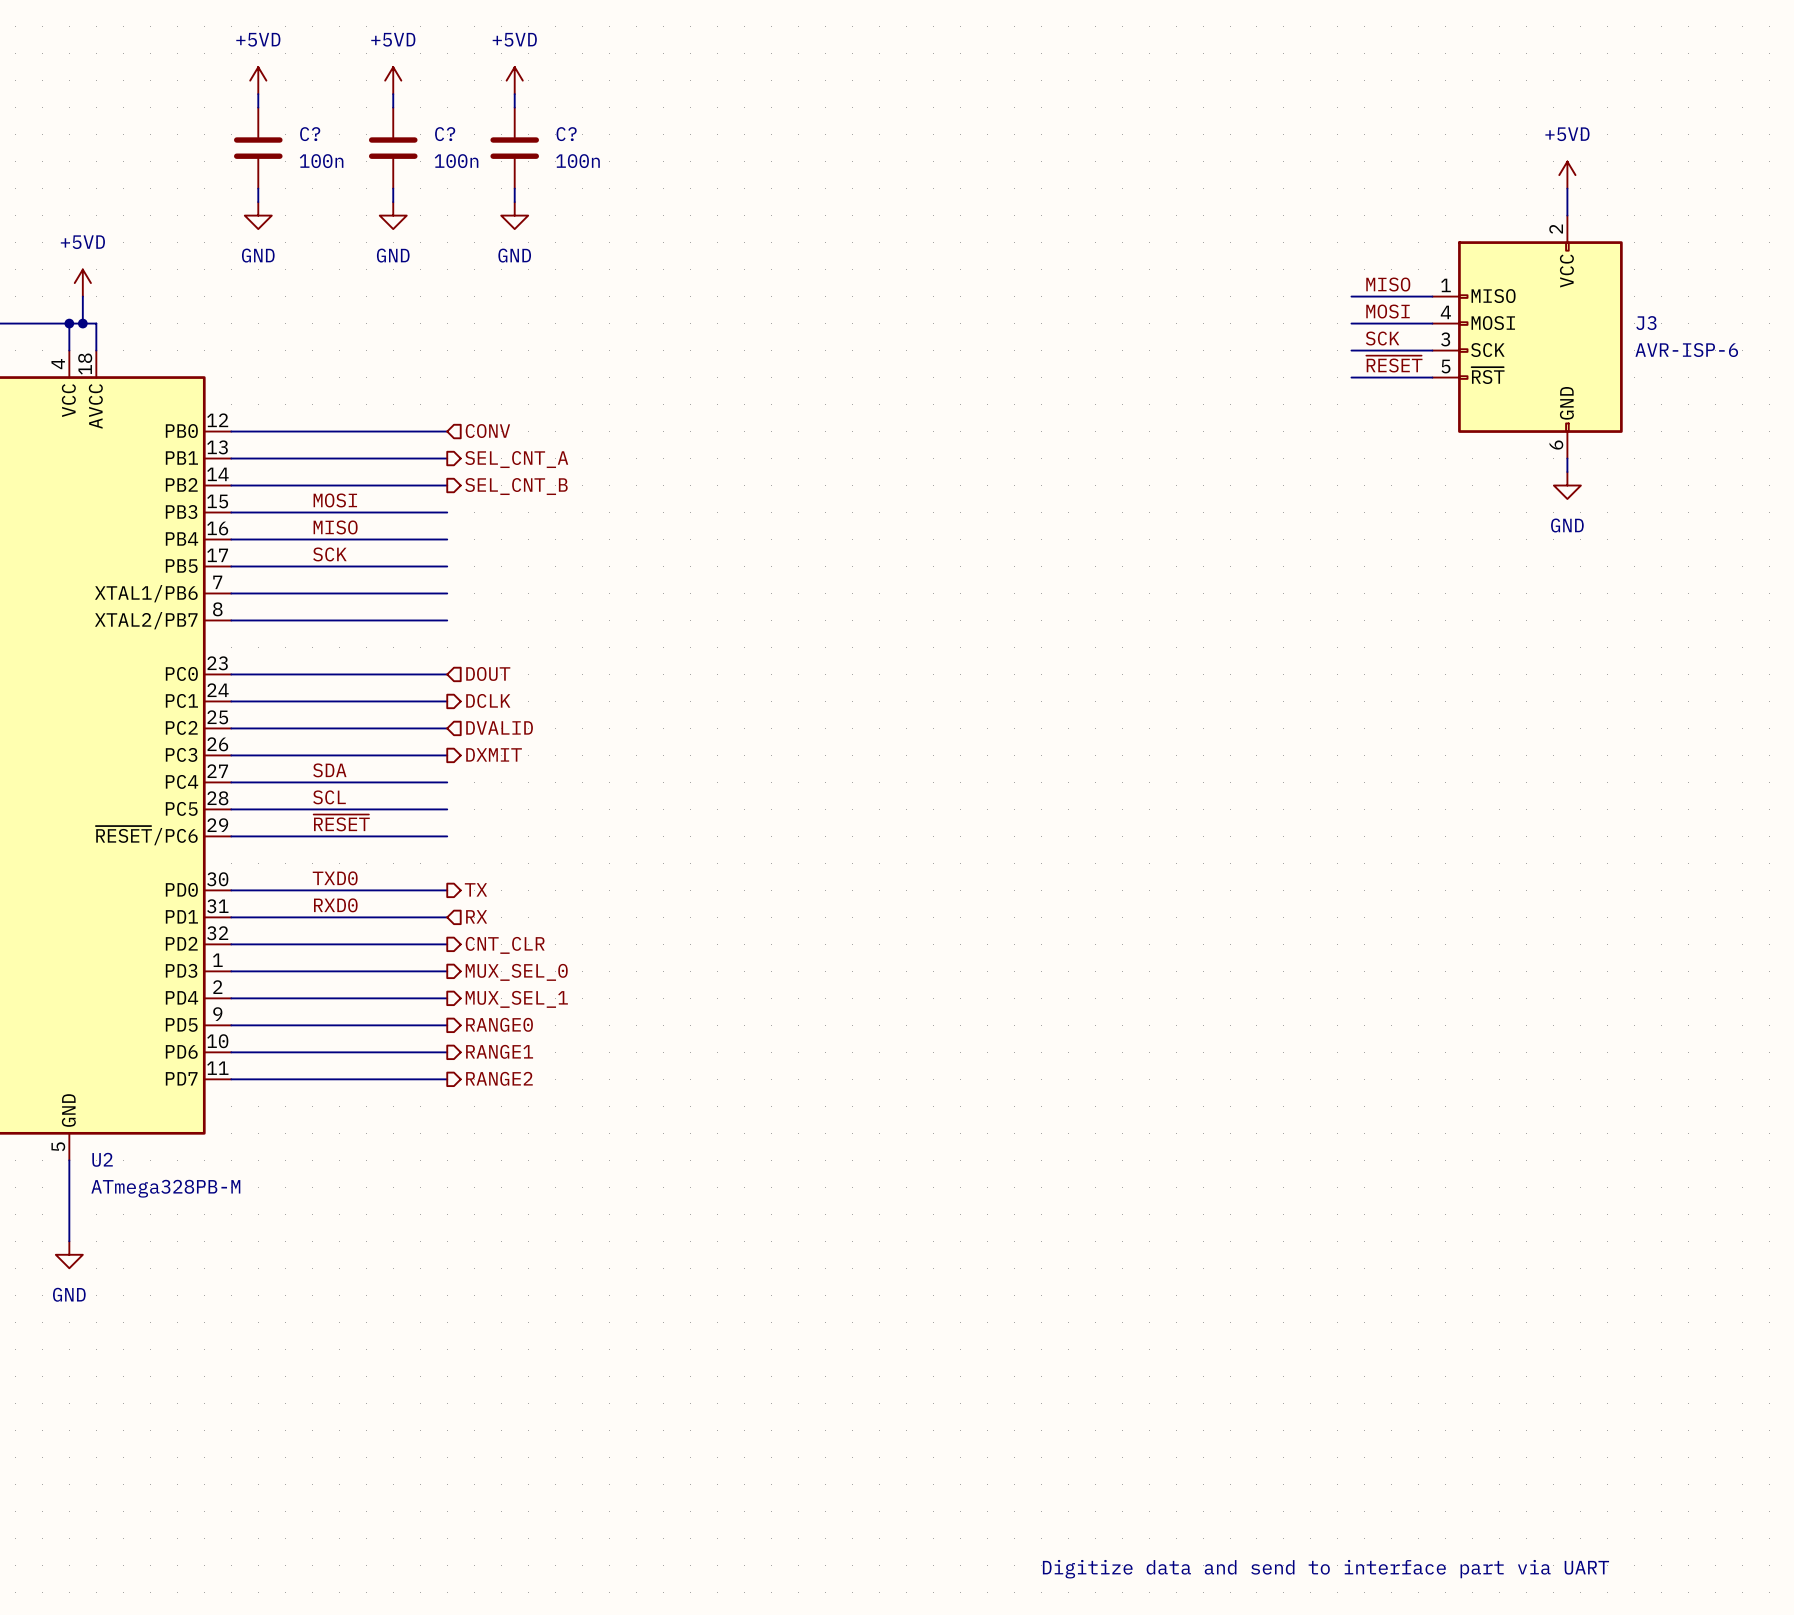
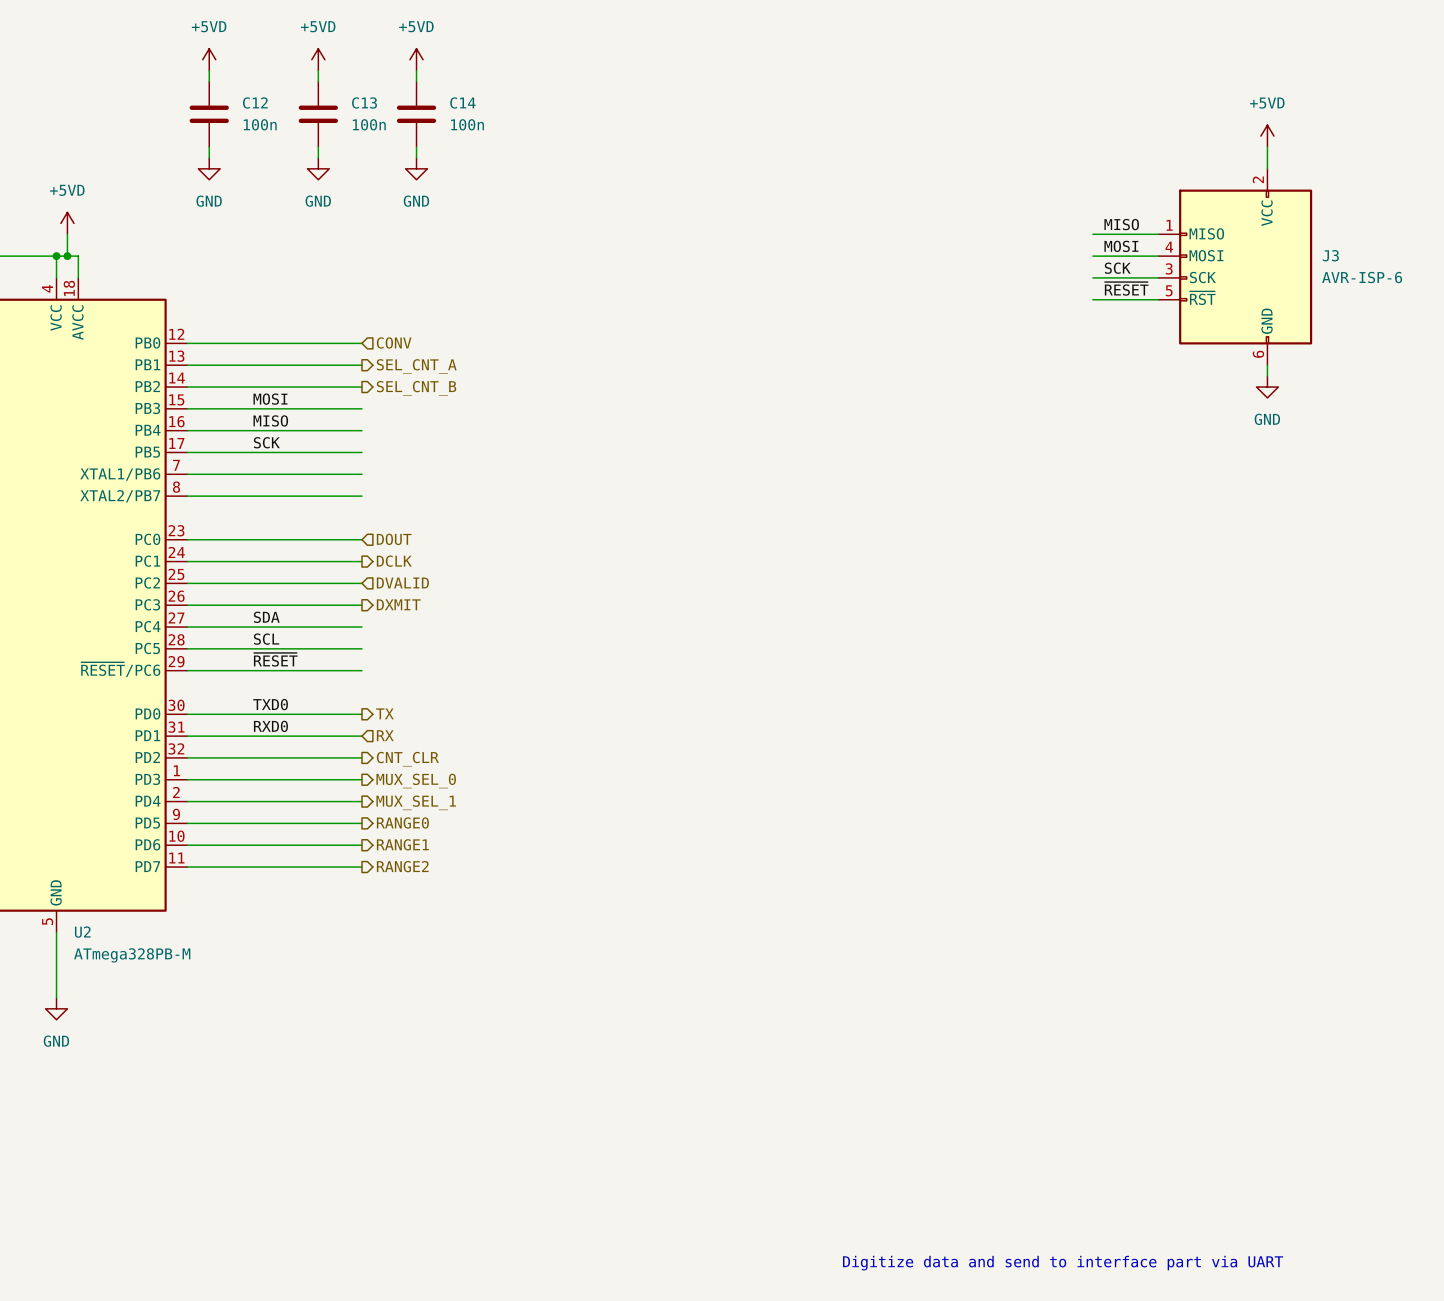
C? name: C? (310, 134) -> C12 (255, 102)
C? name: C? (445, 134) -> C13 (364, 102)
C? name: C? (566, 134) -> C14 (462, 102)

